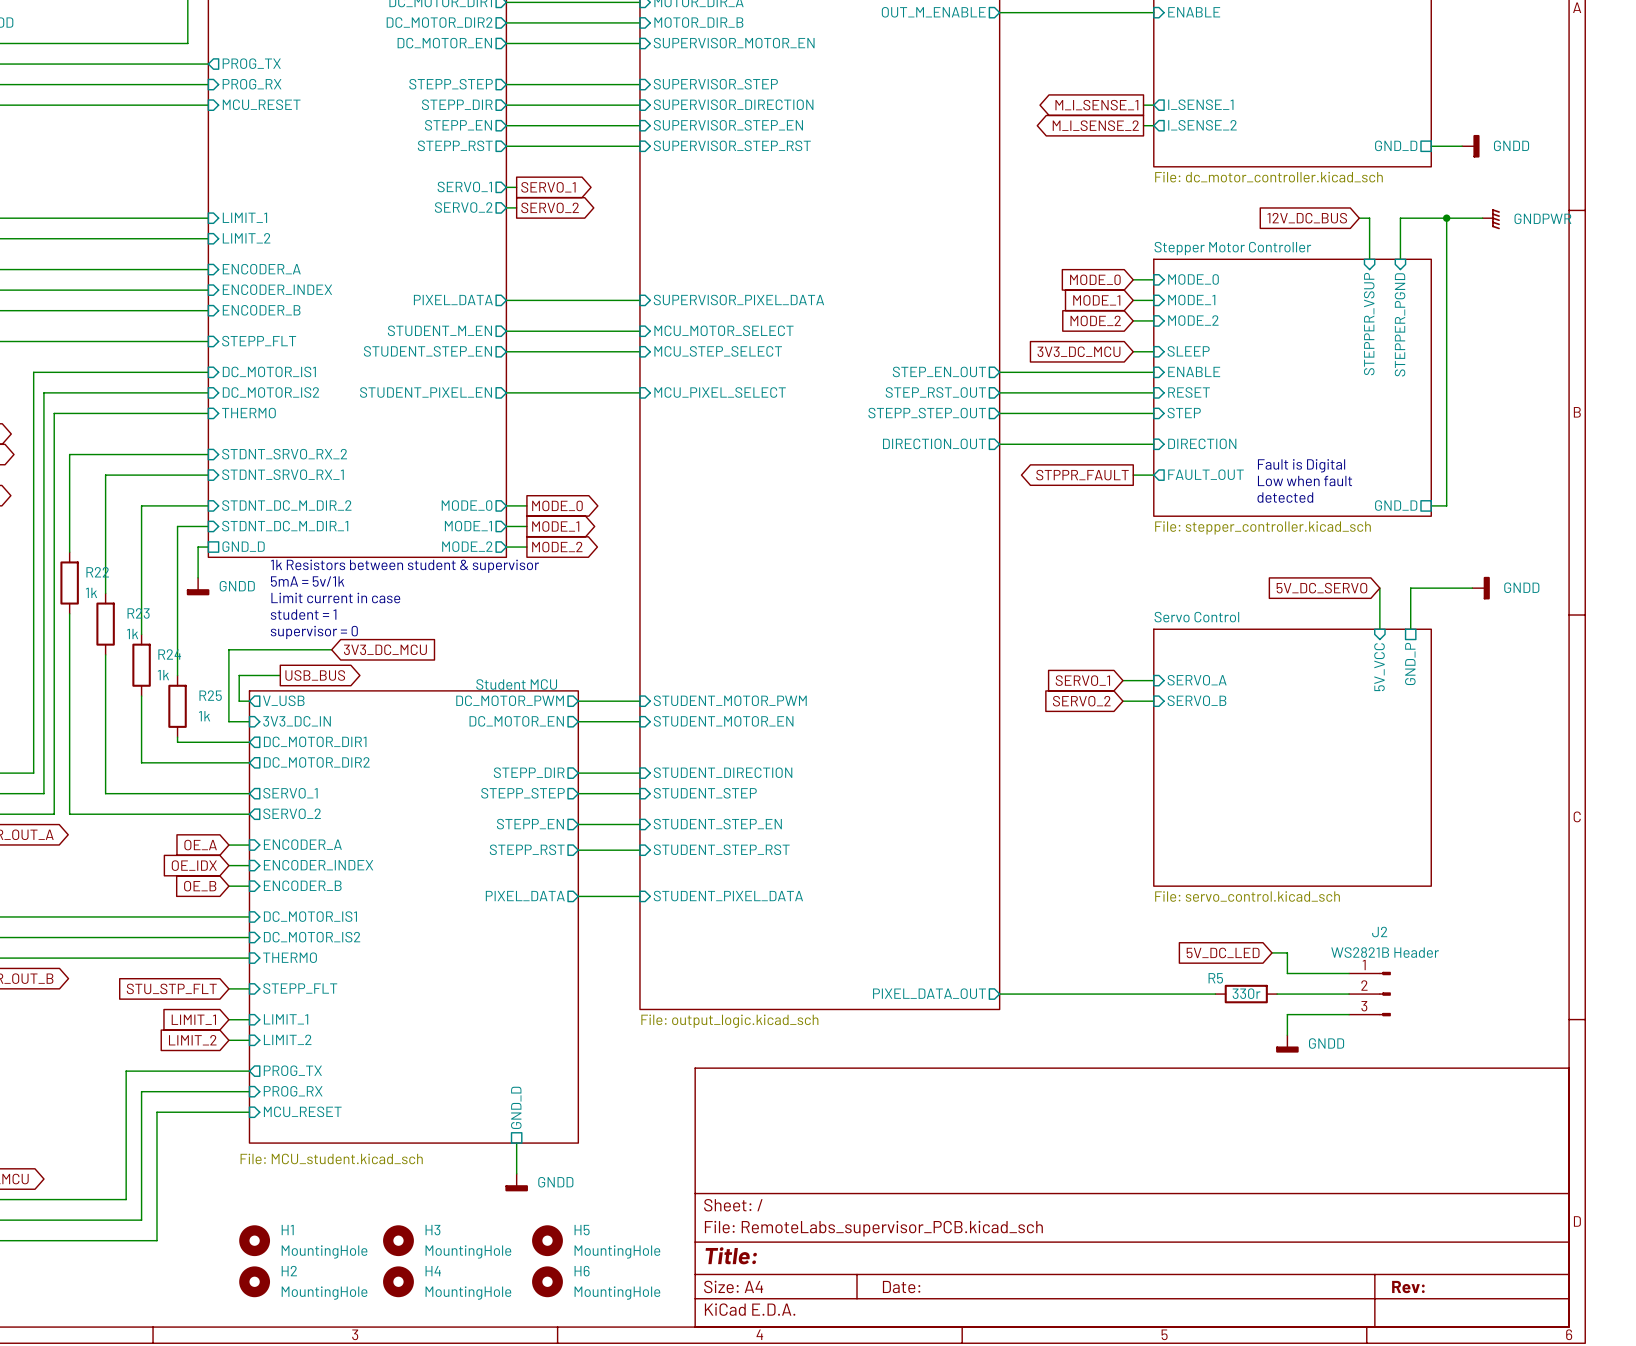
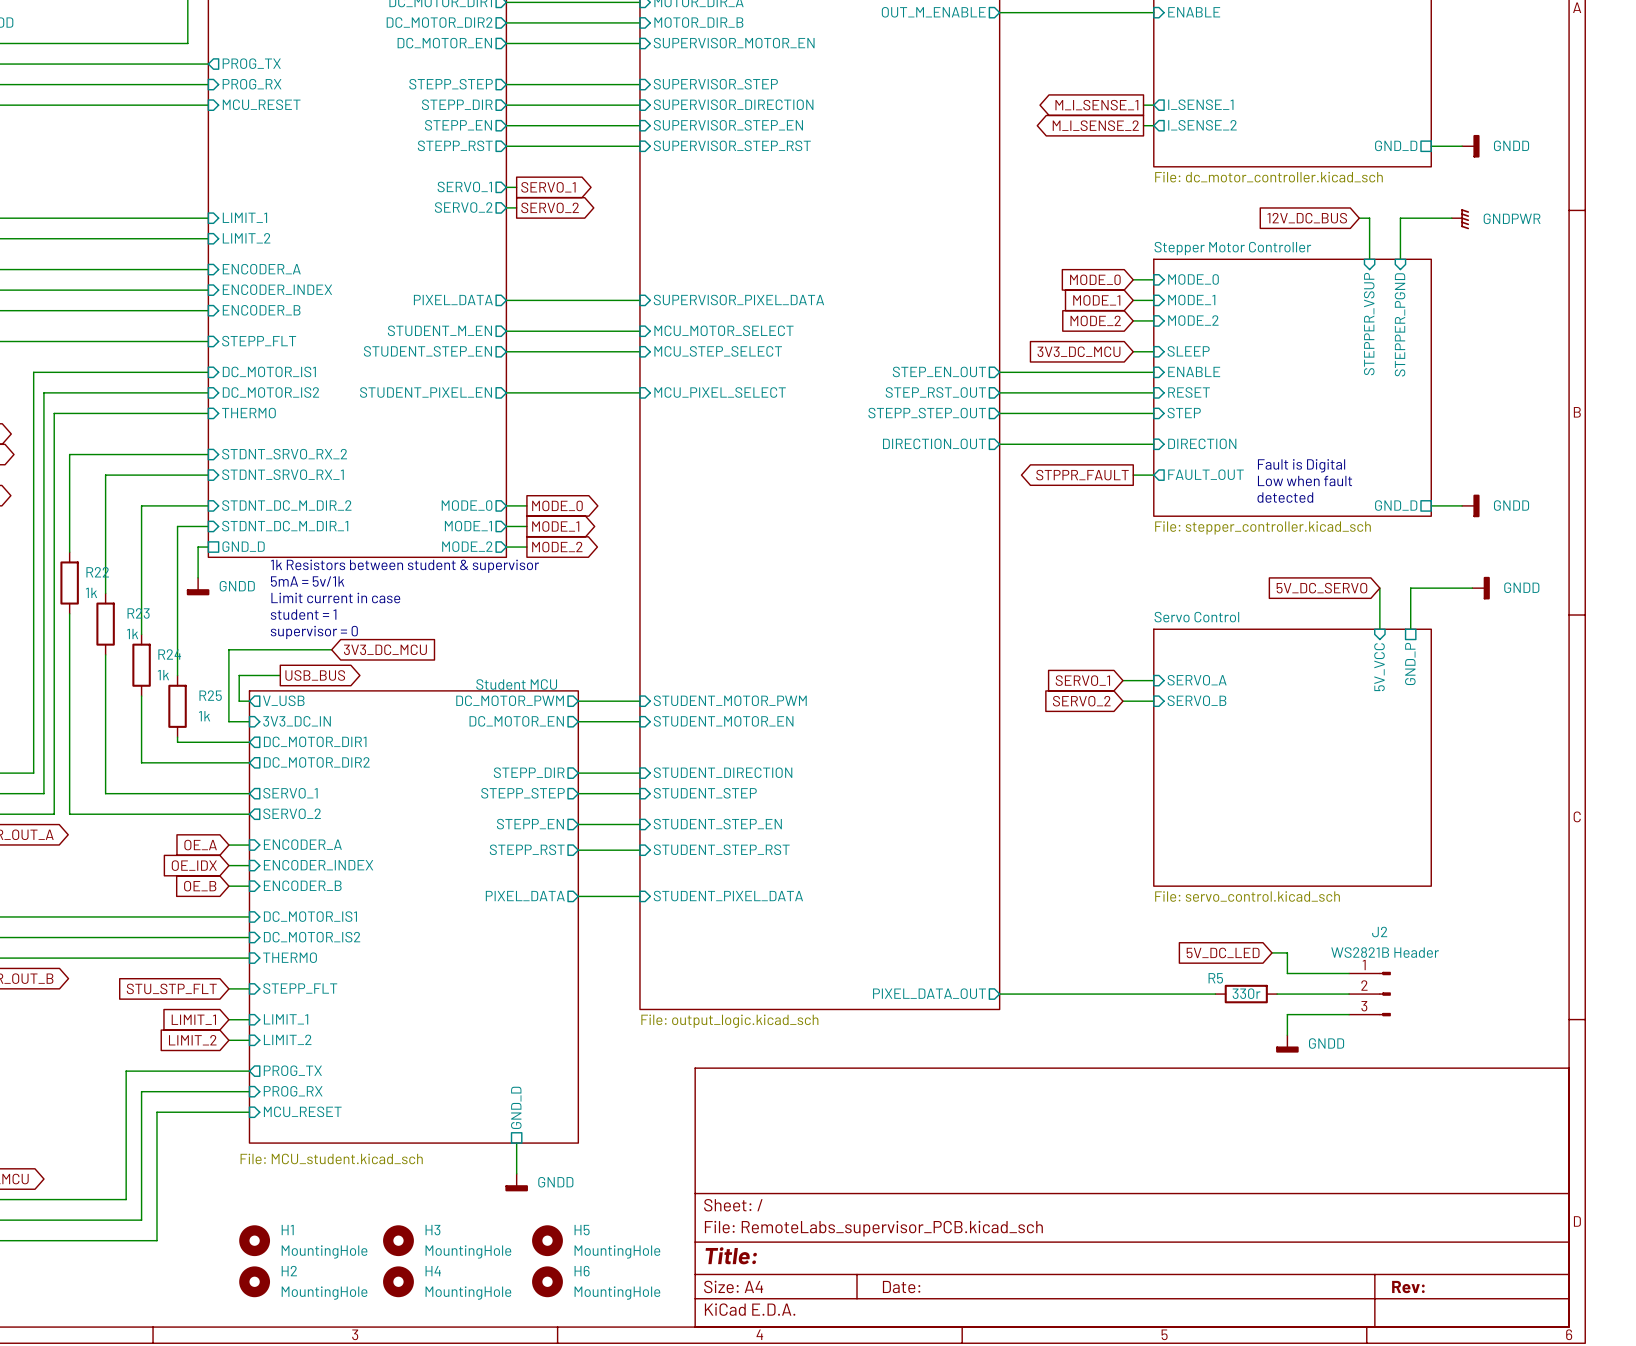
wire: (1446, 218) (1446, 505) -> (1462, 505) (1446, 505)
junction: (1446, 218) -> none
wire: (1451, 218) (1482, 218) -> none
power symbol position: GNDPWR (1491, 219) -> GNDPWR (1460, 219)
power symbol: none -> GNDD (1470, 505)

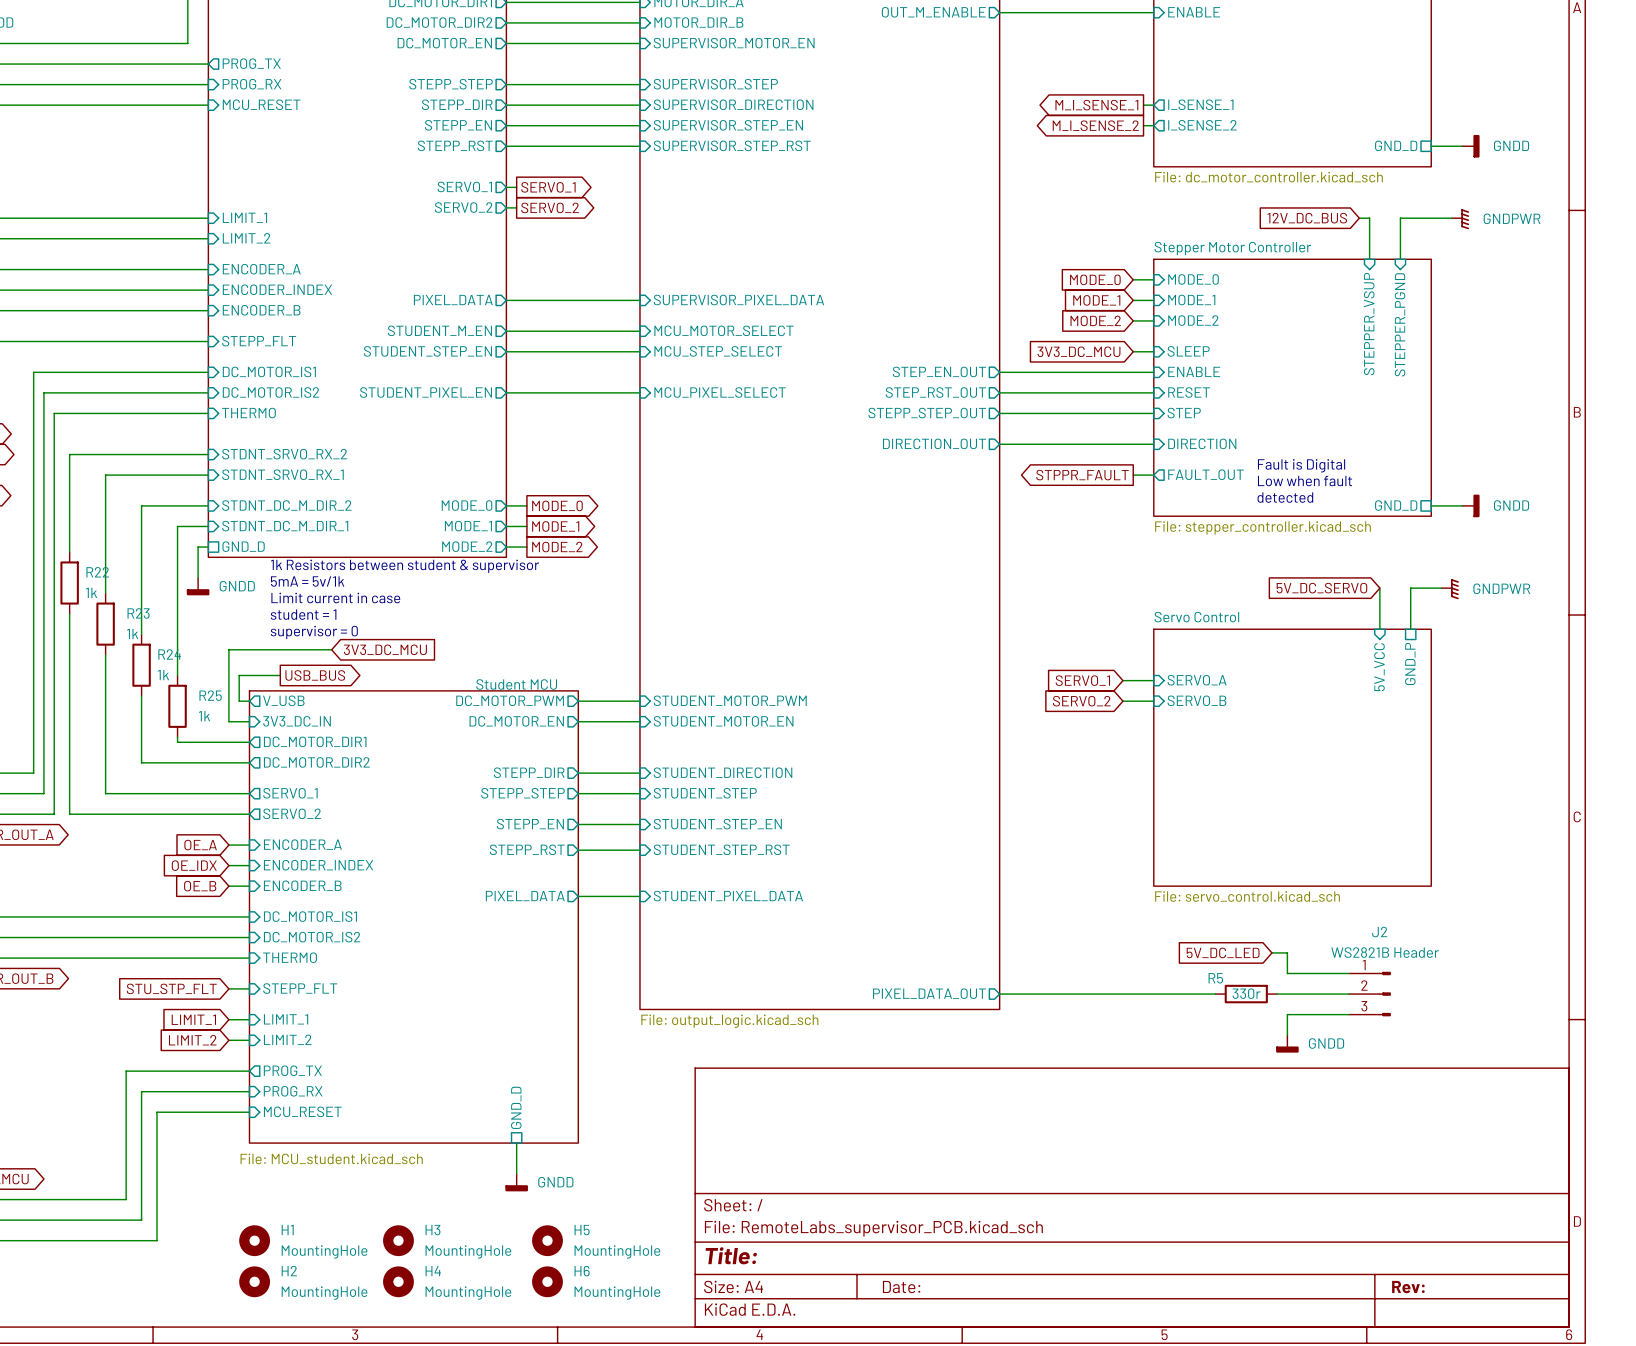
wire: (1441, 588) (1472, 588) -> none
power symbol: GNDD (1481, 588) -> none
power symbol: none -> GNDPWR (1450, 589)

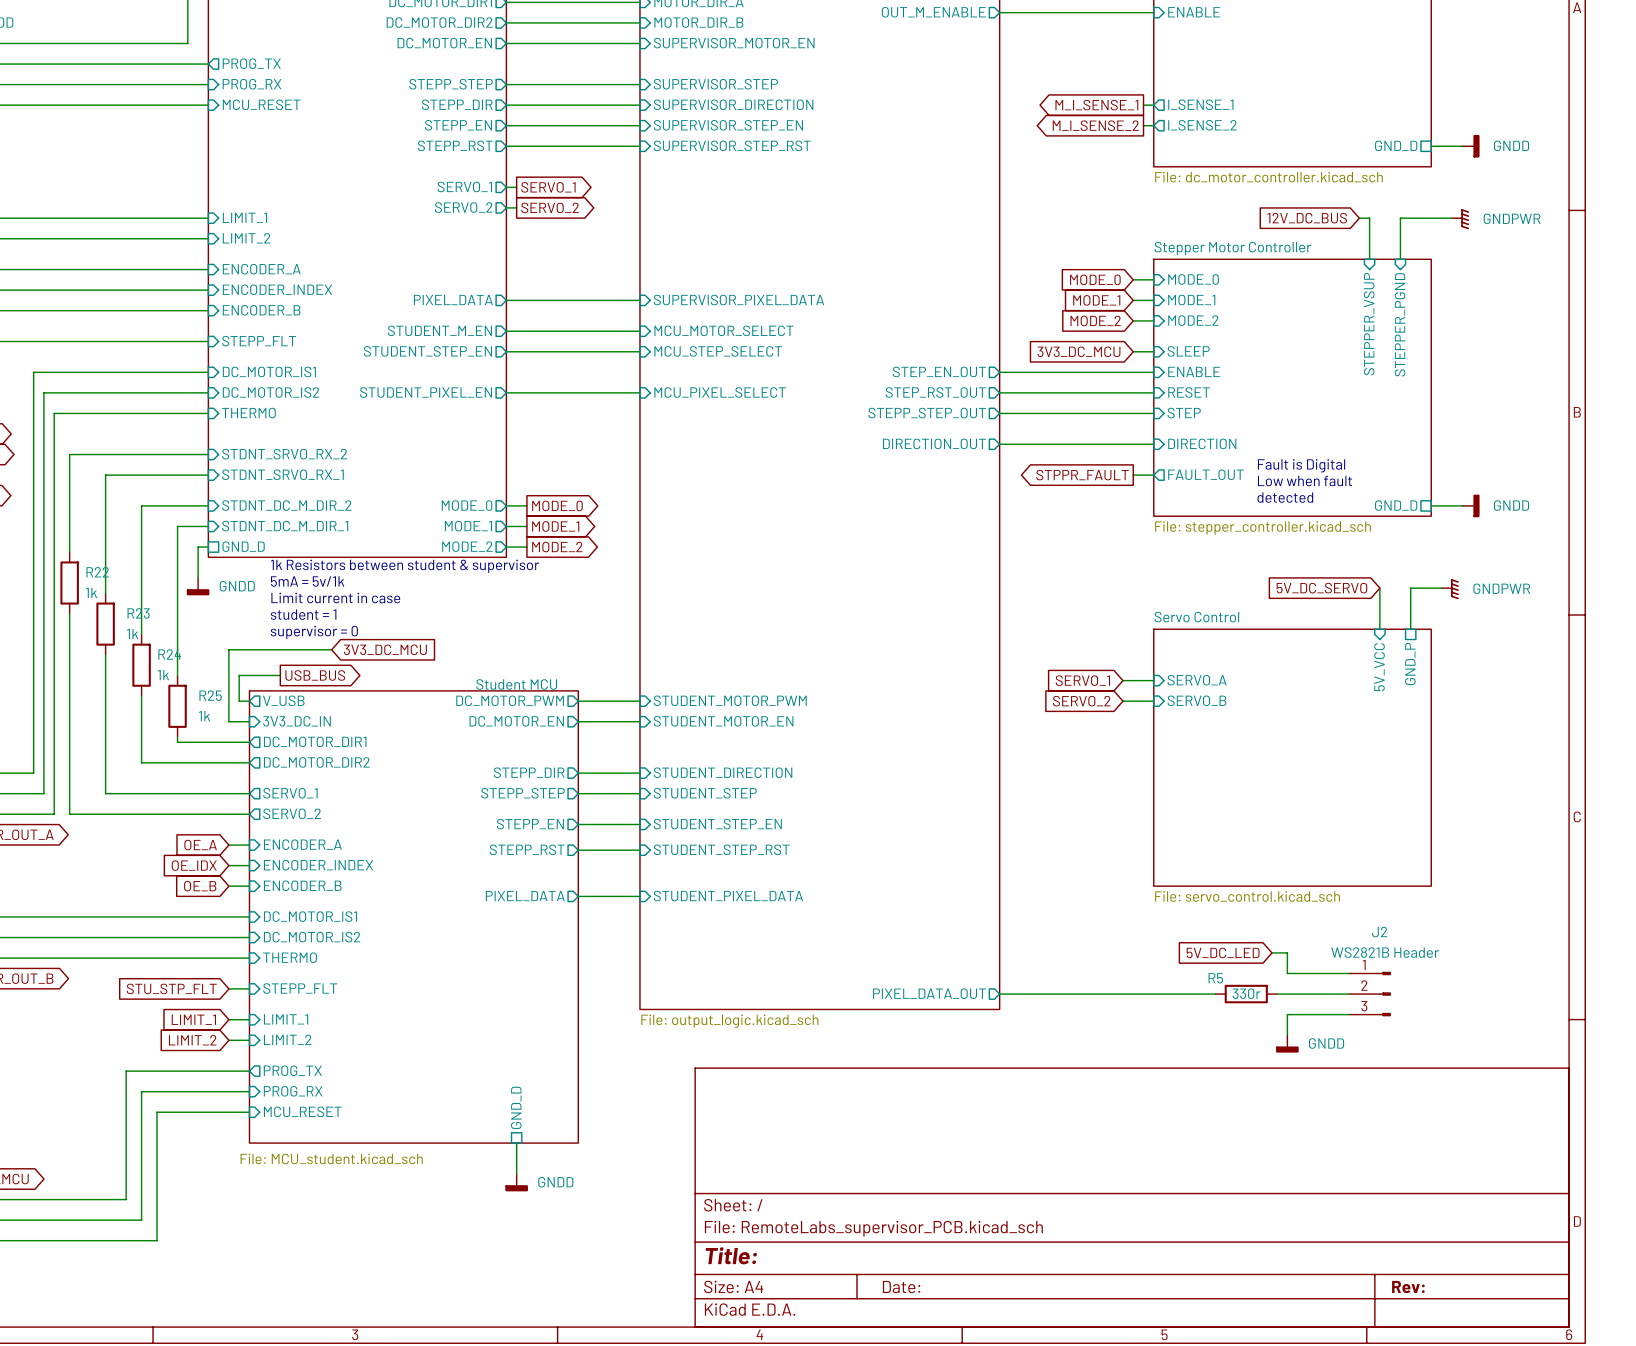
H1: MountingHole (254, 1240) -> none
H3: MountingHole (398, 1240) -> none
H5: MountingHole (547, 1240) -> none
H2: MountingHole (254, 1281) -> none
H4: MountingHole (398, 1281) -> none
H6: MountingHole (547, 1281) -> none

